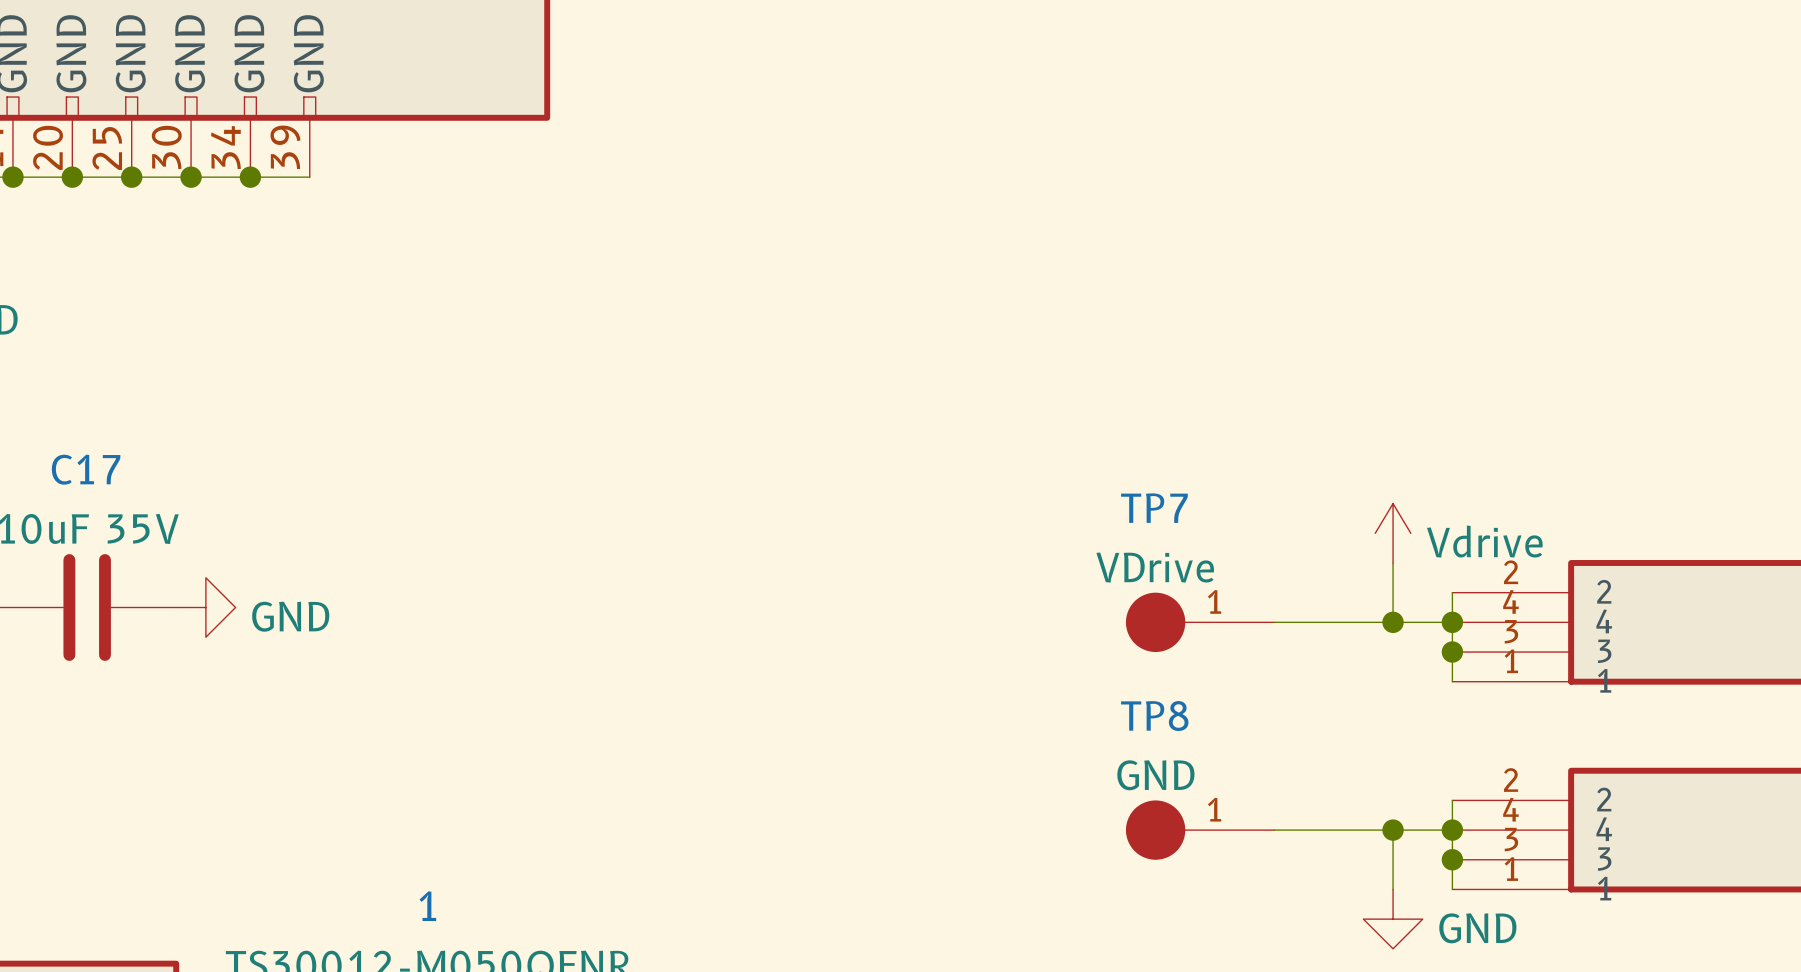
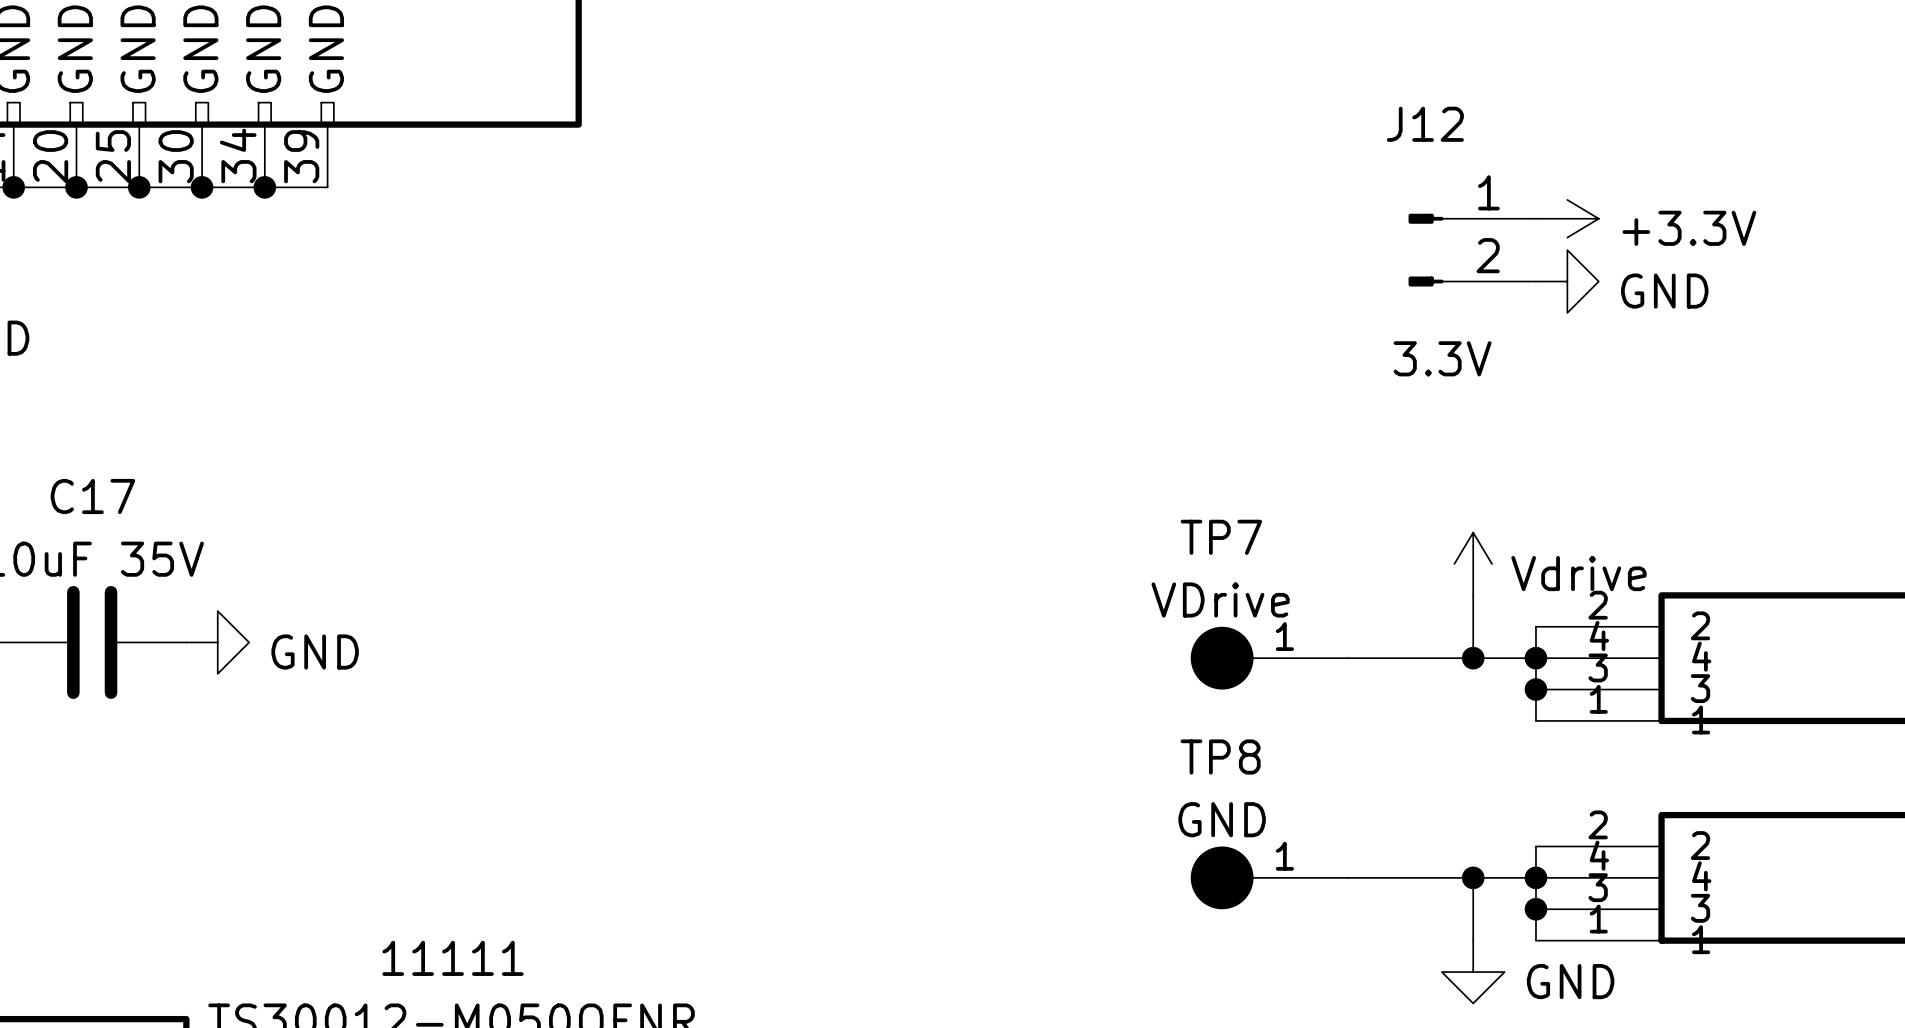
power symbol: none -> +3.3V (1567, 218)
J12: none -> 3.3V (1472, 250)
power symbol: none -> GND (1567, 281)
1 name: 1 (427, 906) -> 11111 (453, 958)

